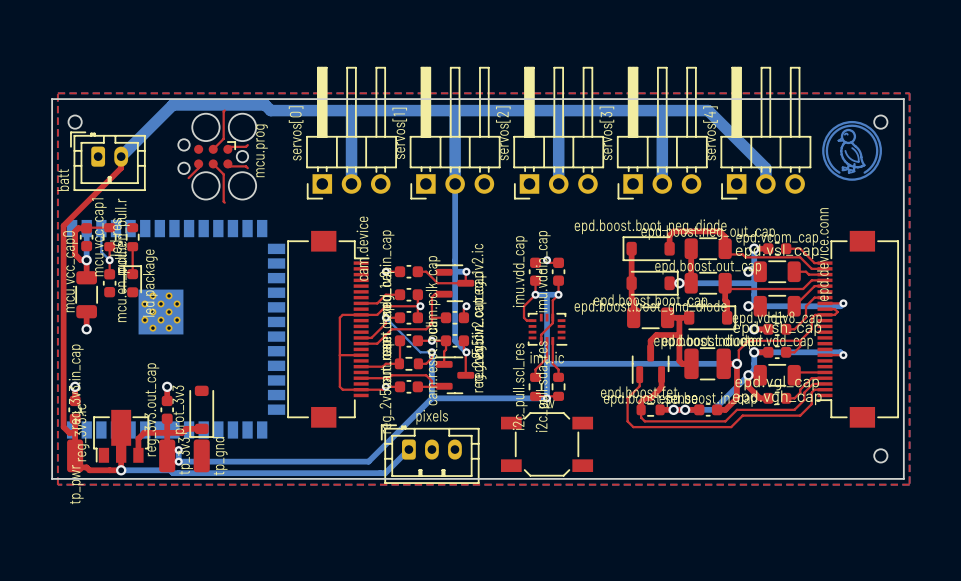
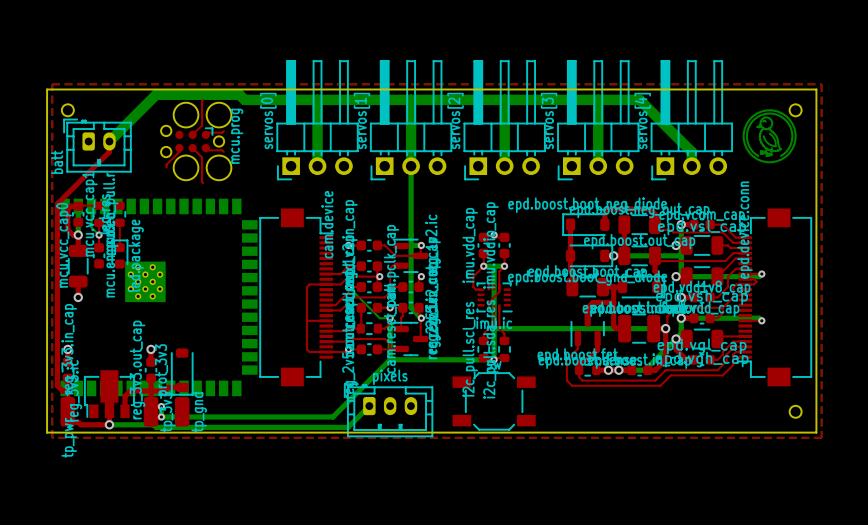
top track: none -> (170, 160) (166, 167)

